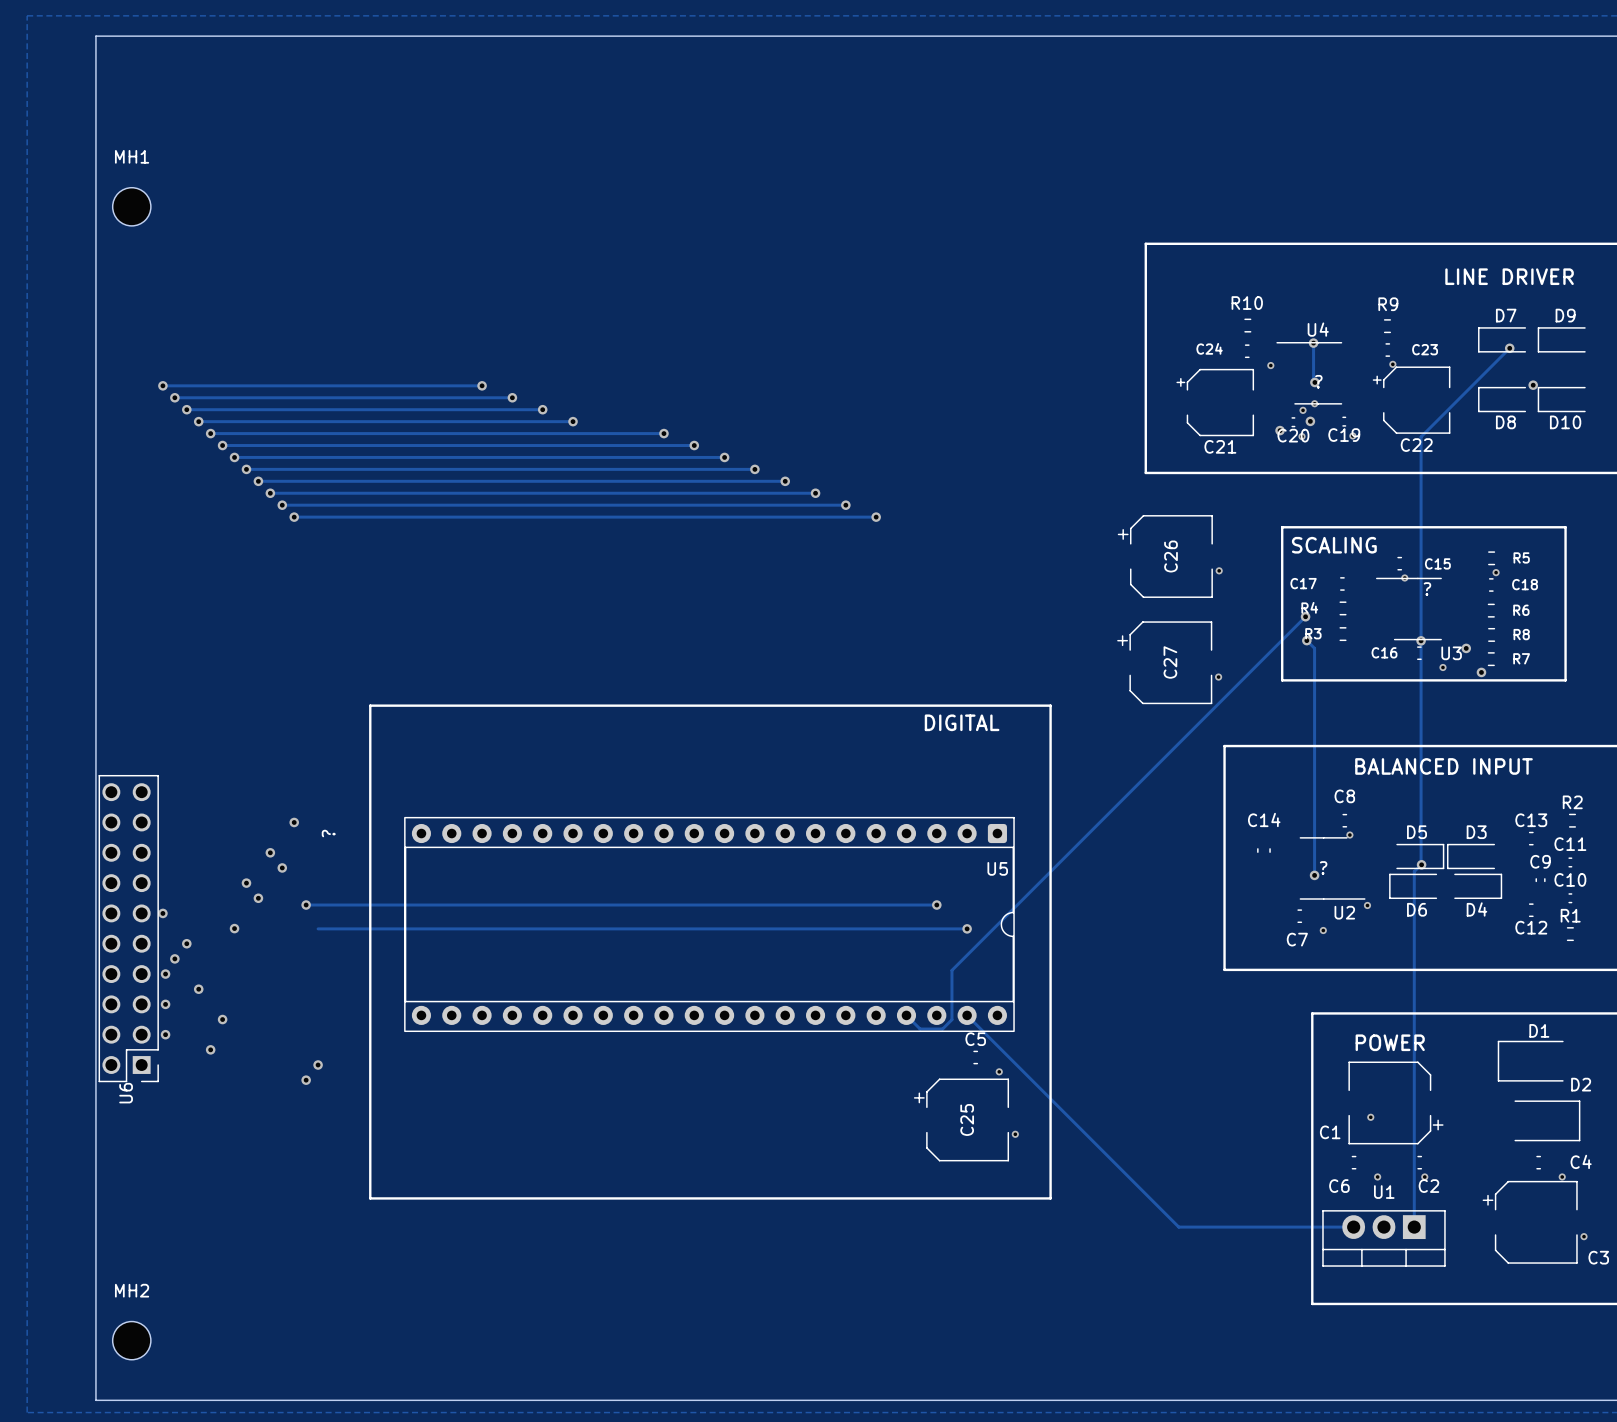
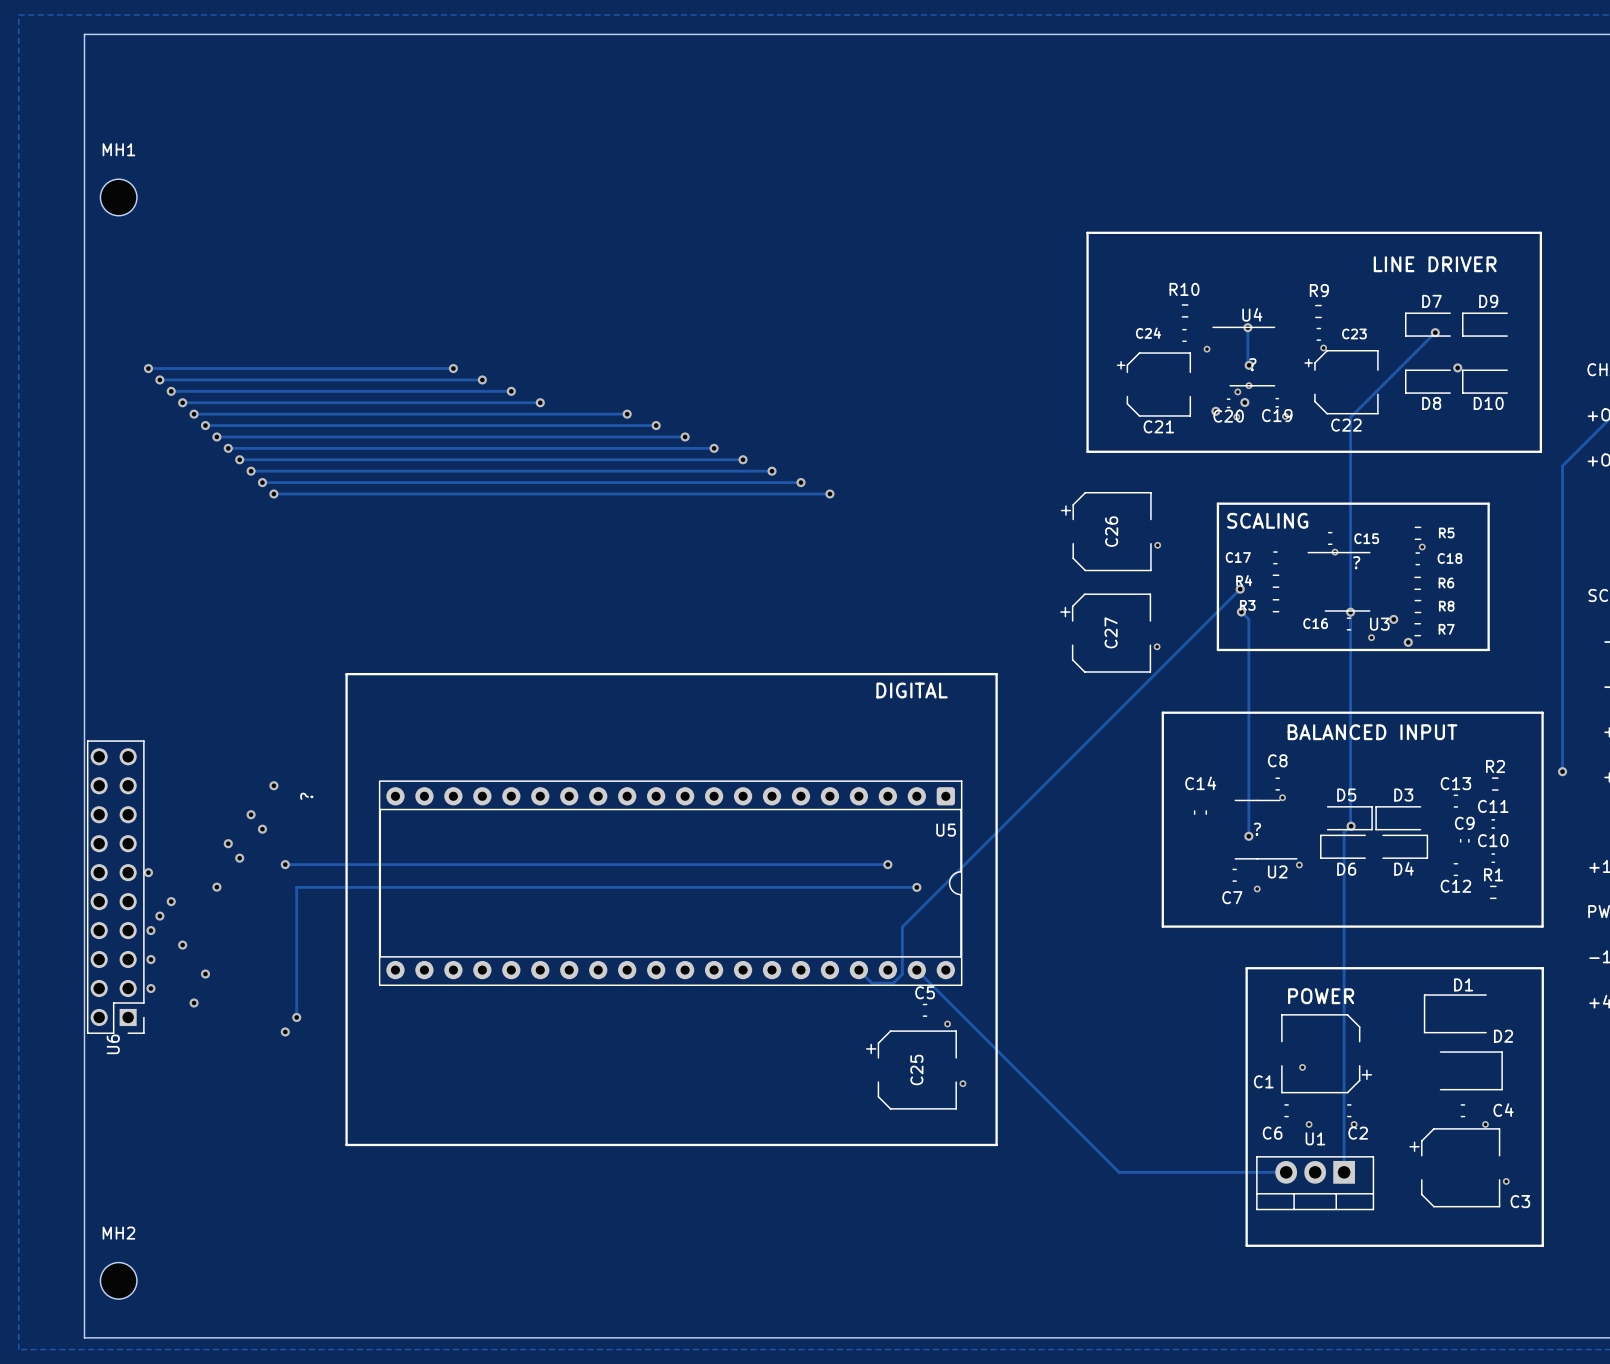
track: none -> (296, 887) (296, 1017)

